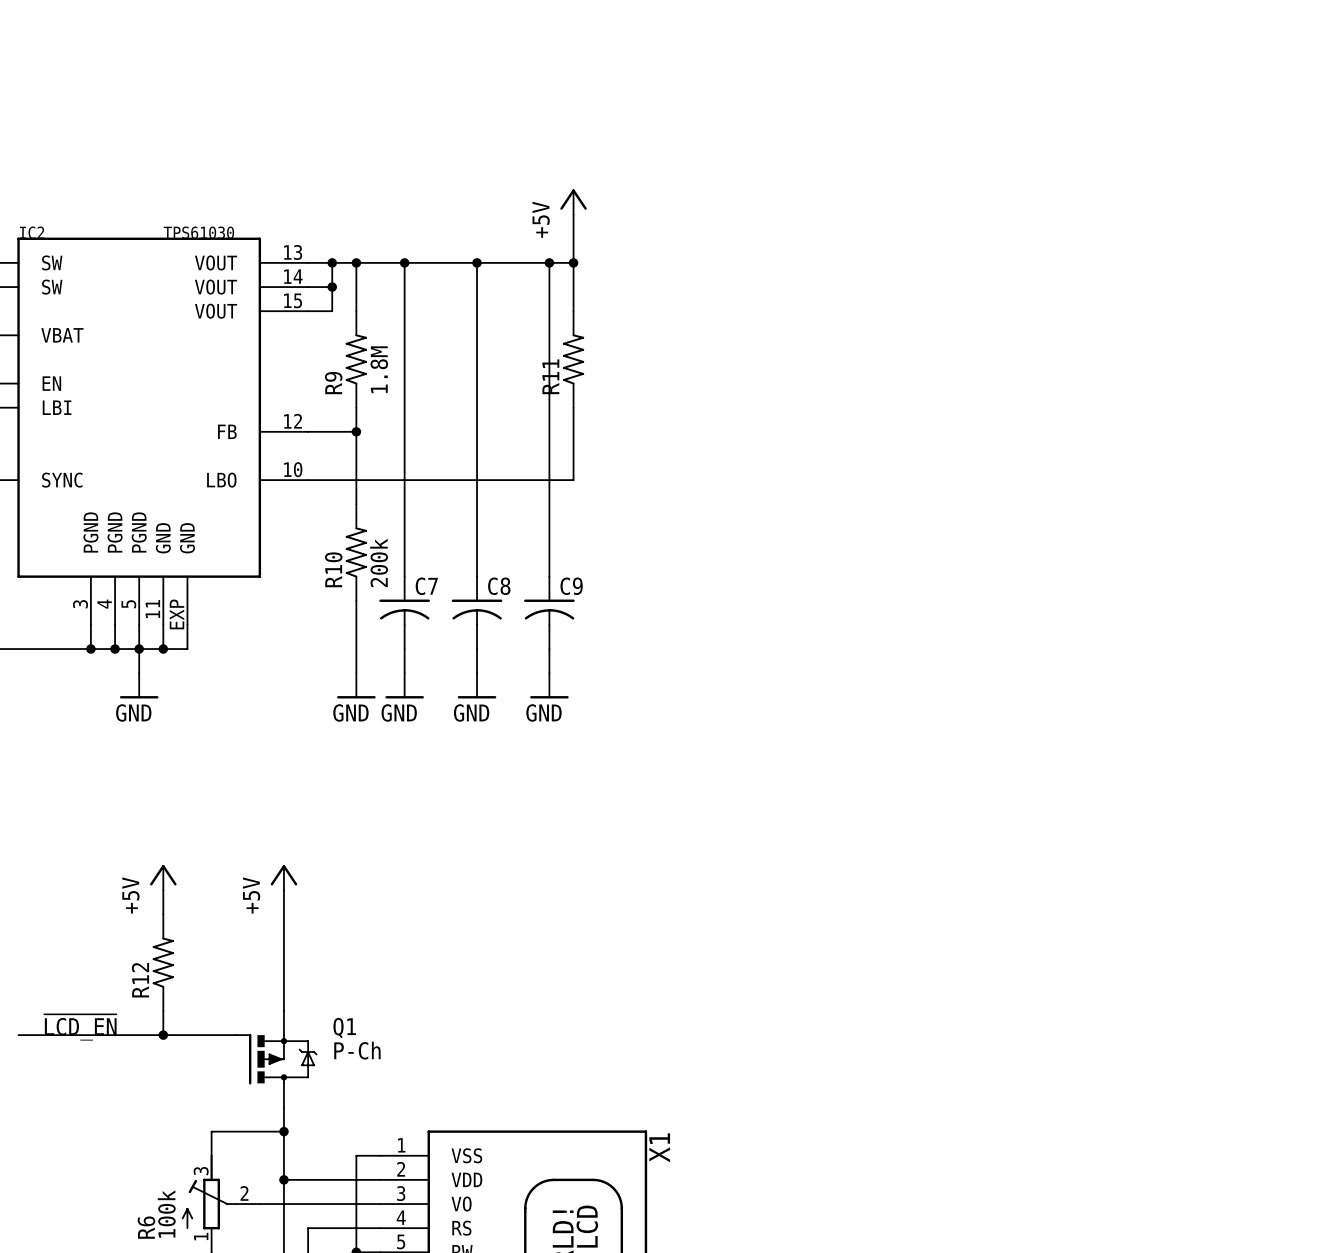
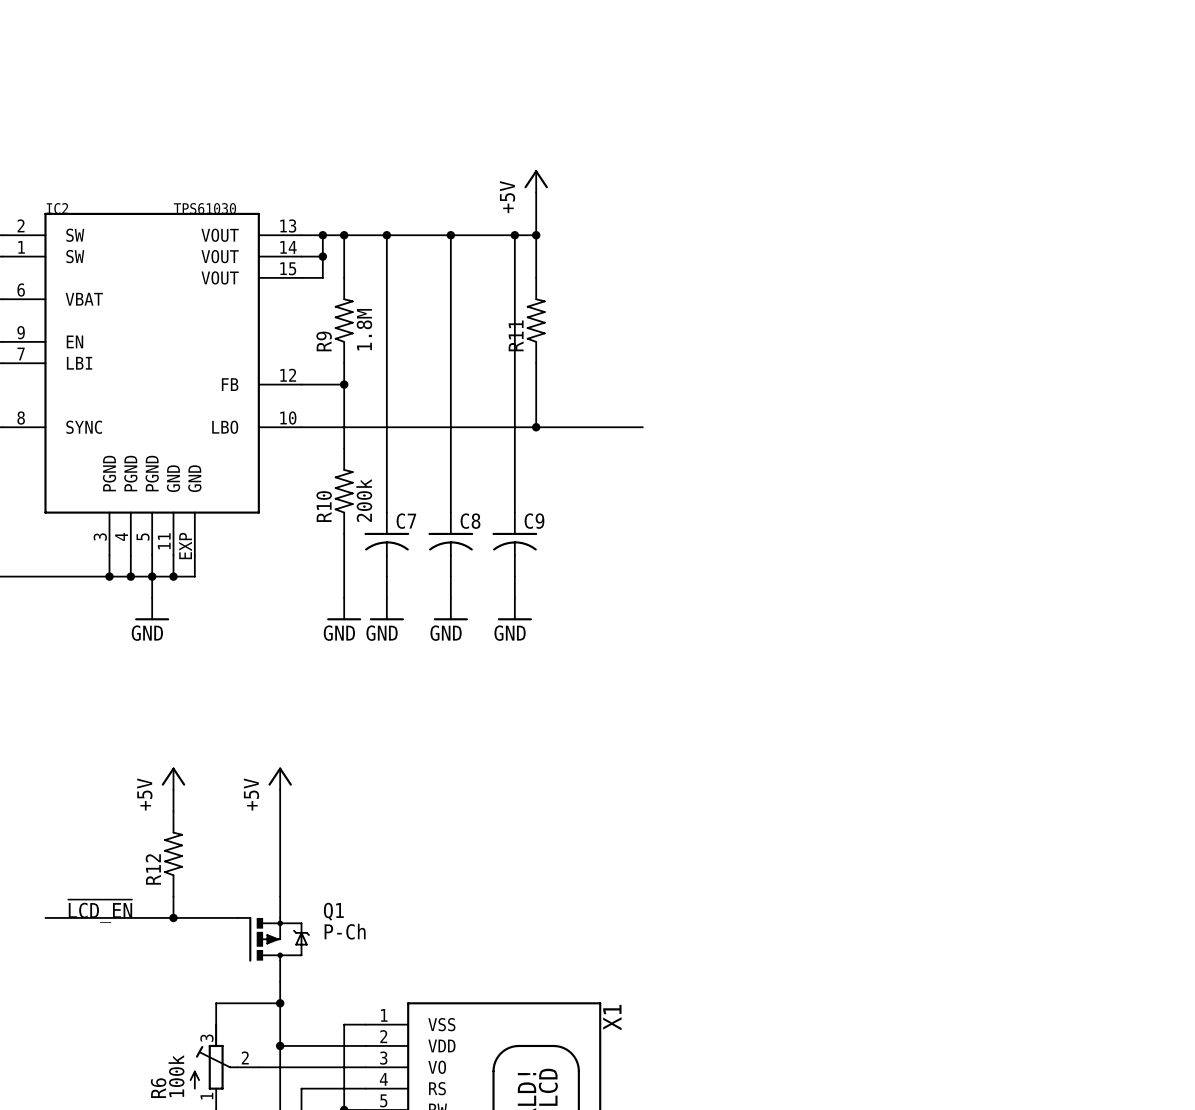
wire: none -> (536, 427) (642, 427)
junction: none -> (536, 427)

